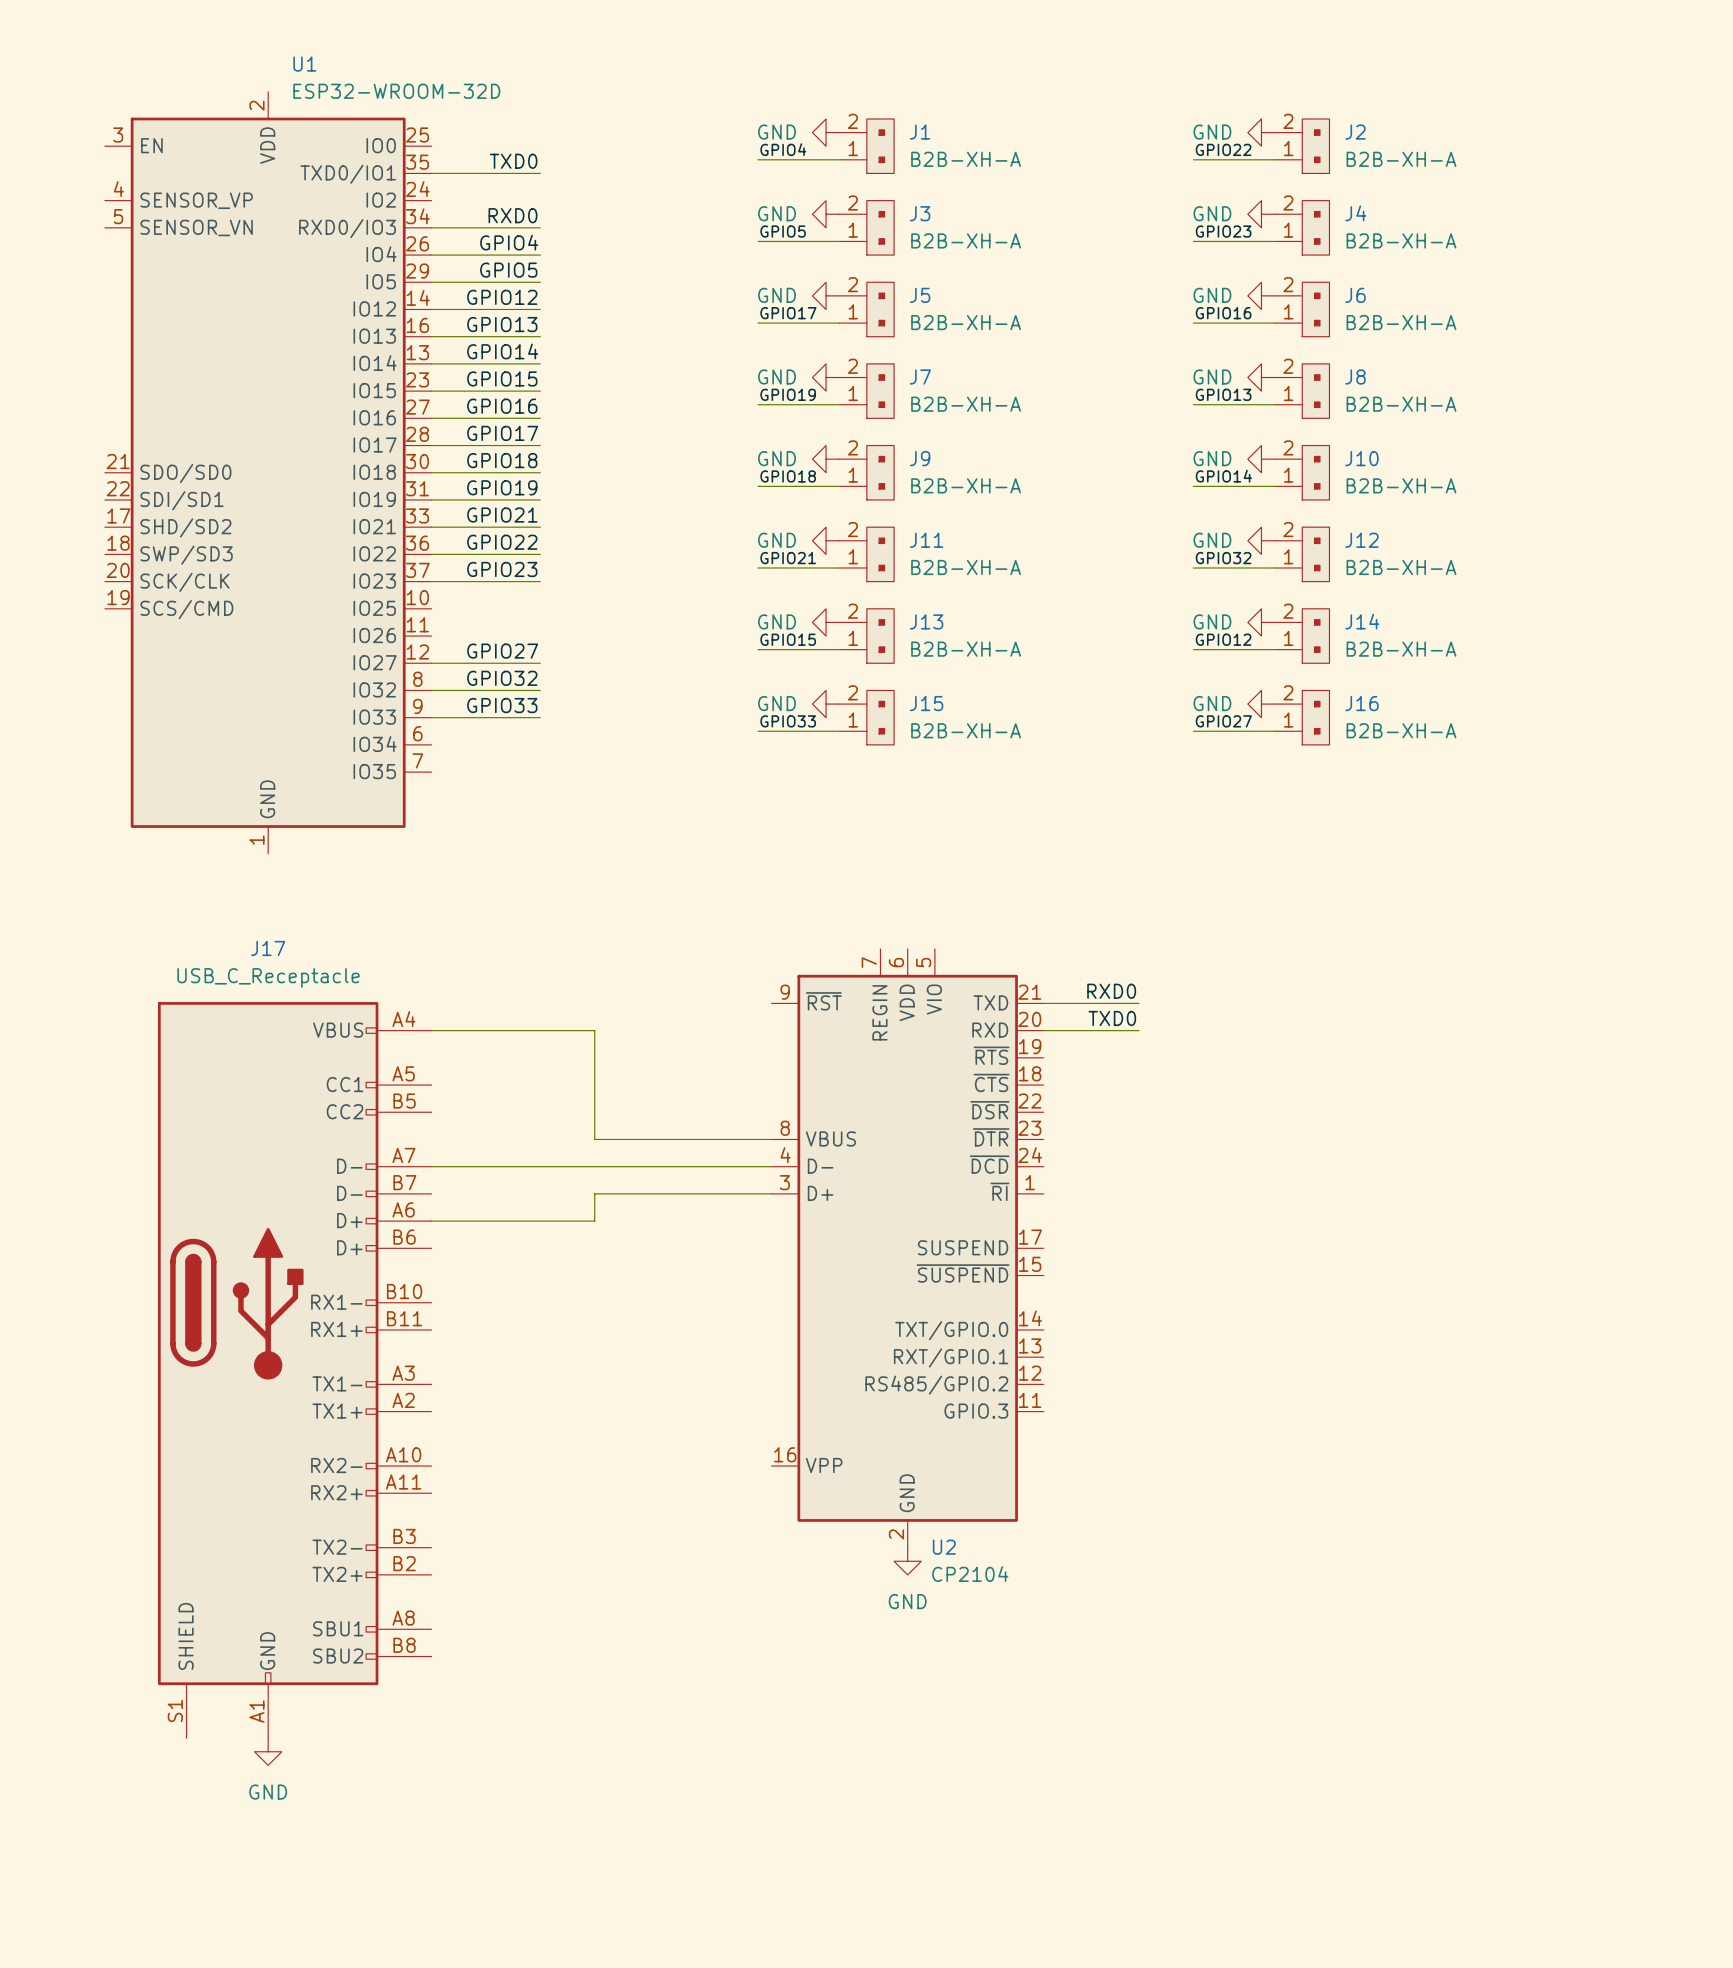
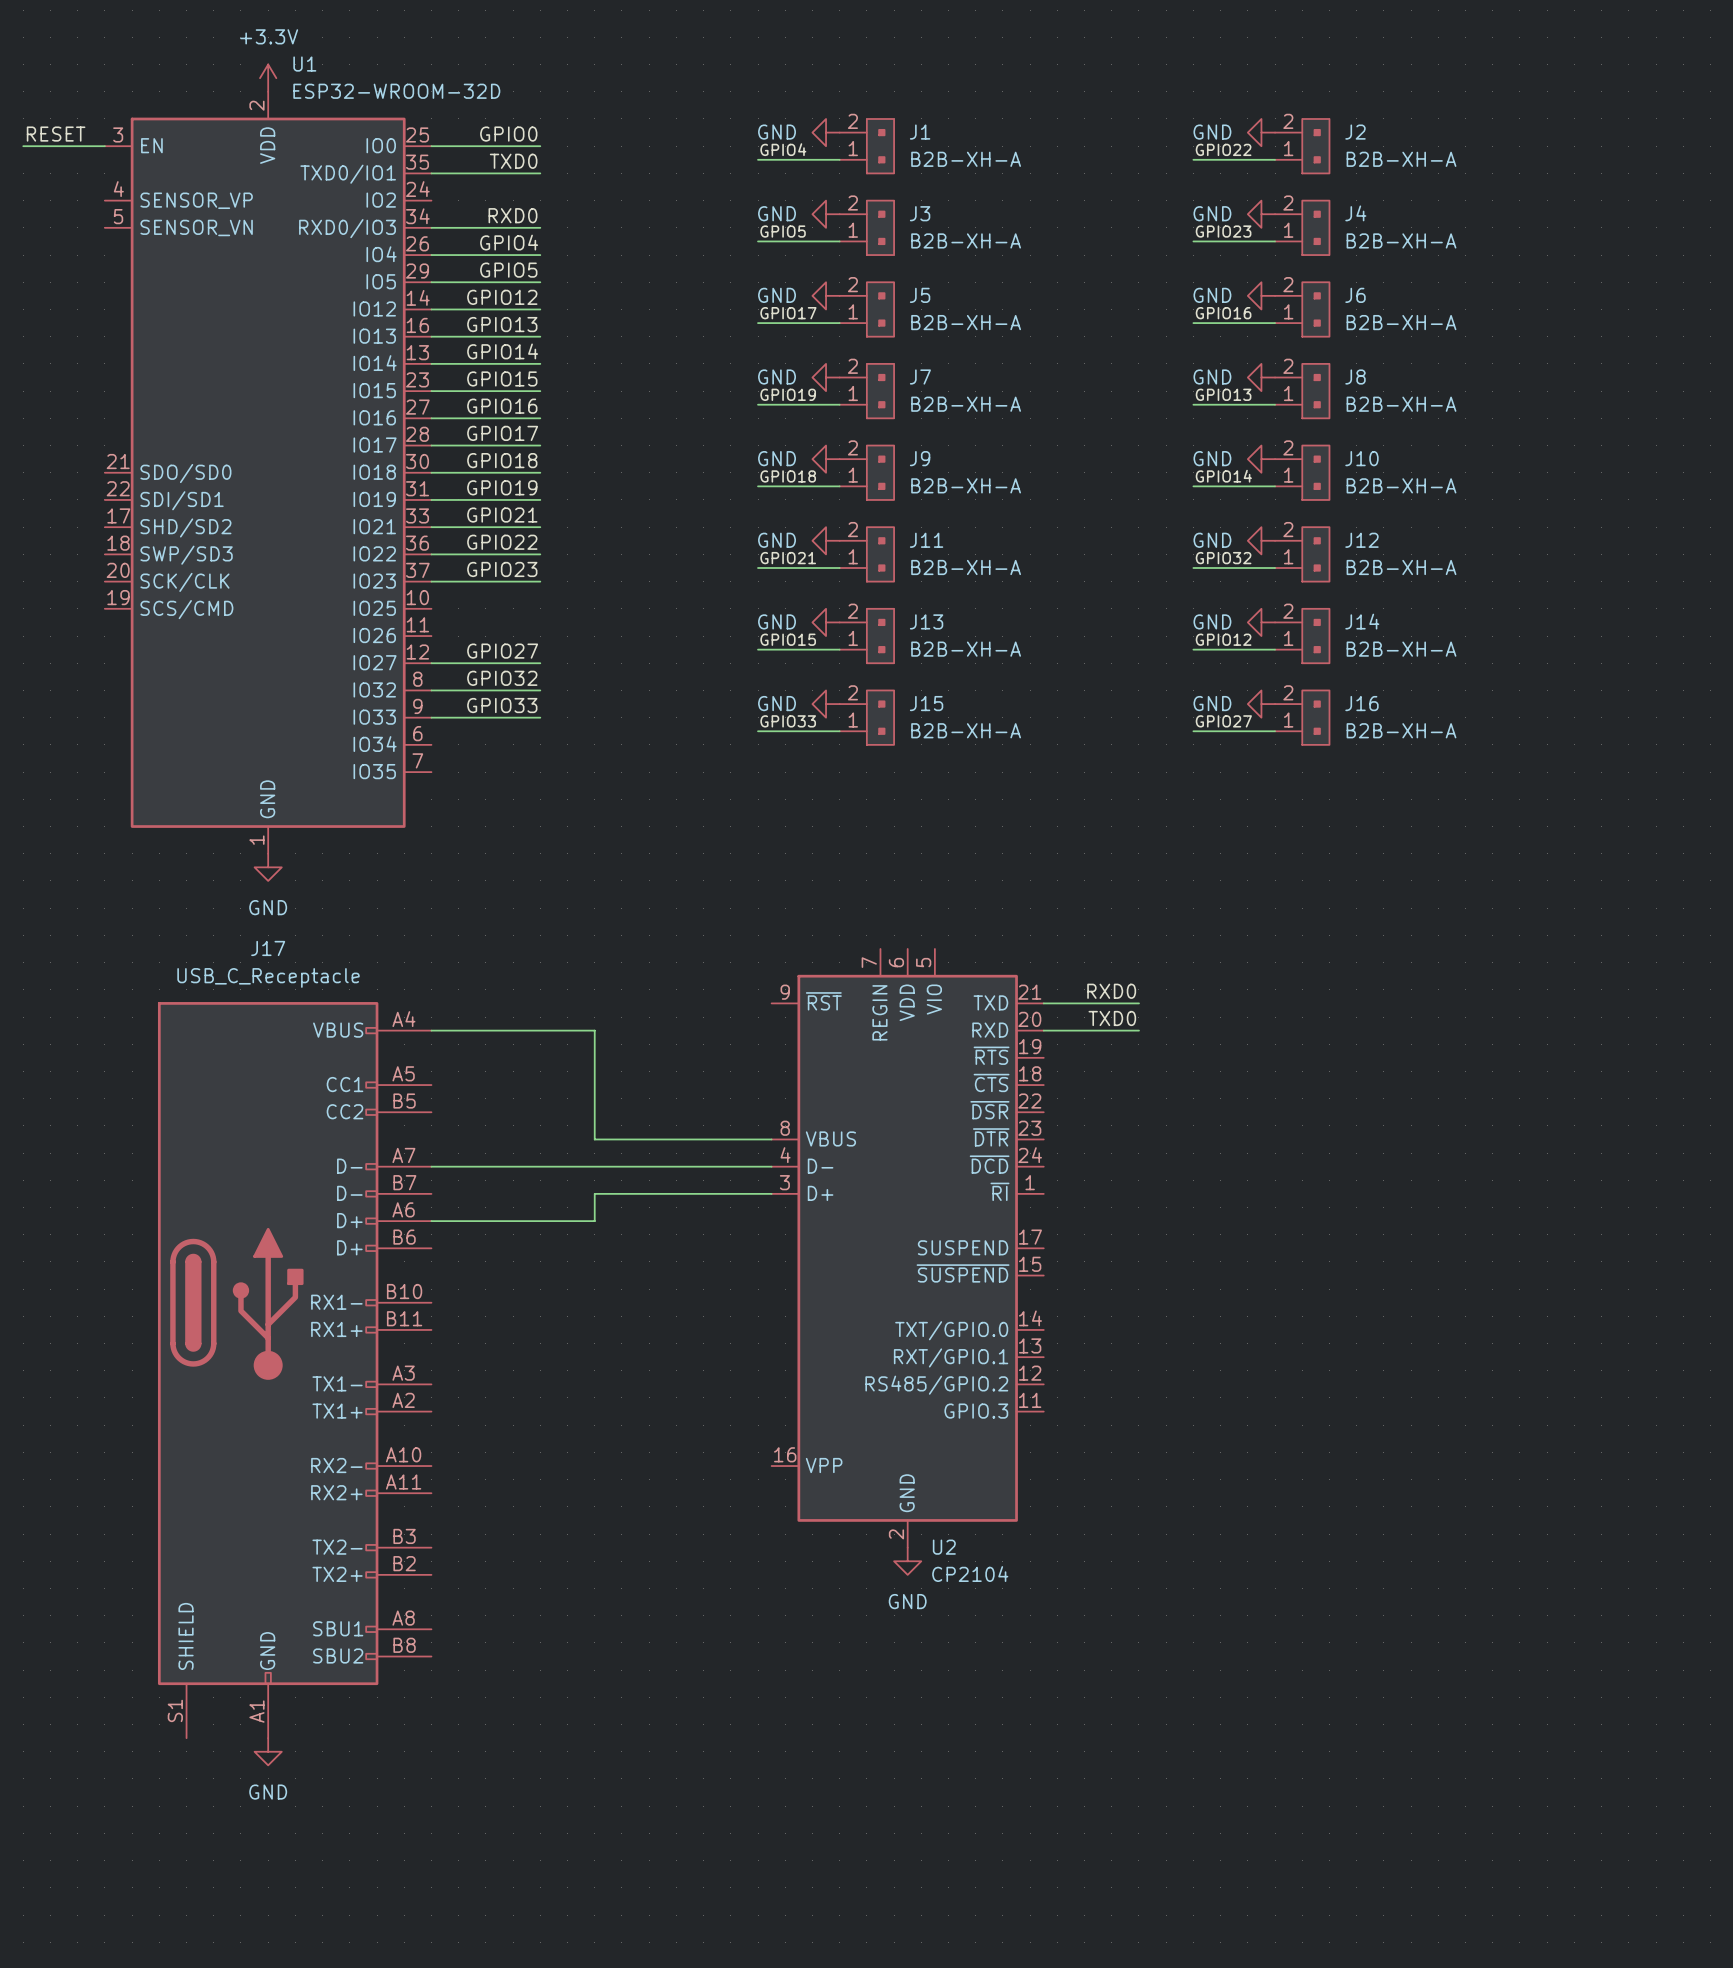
power symbol: none -> +3.3V (268, 78)
label: none -> RESET (56, 134)
label: none -> GPIO0 (508, 134)
wire: none -> (23, 146) (104, 146)
wire: none -> (431, 146) (540, 146)
power symbol: none -> GND (268, 867)

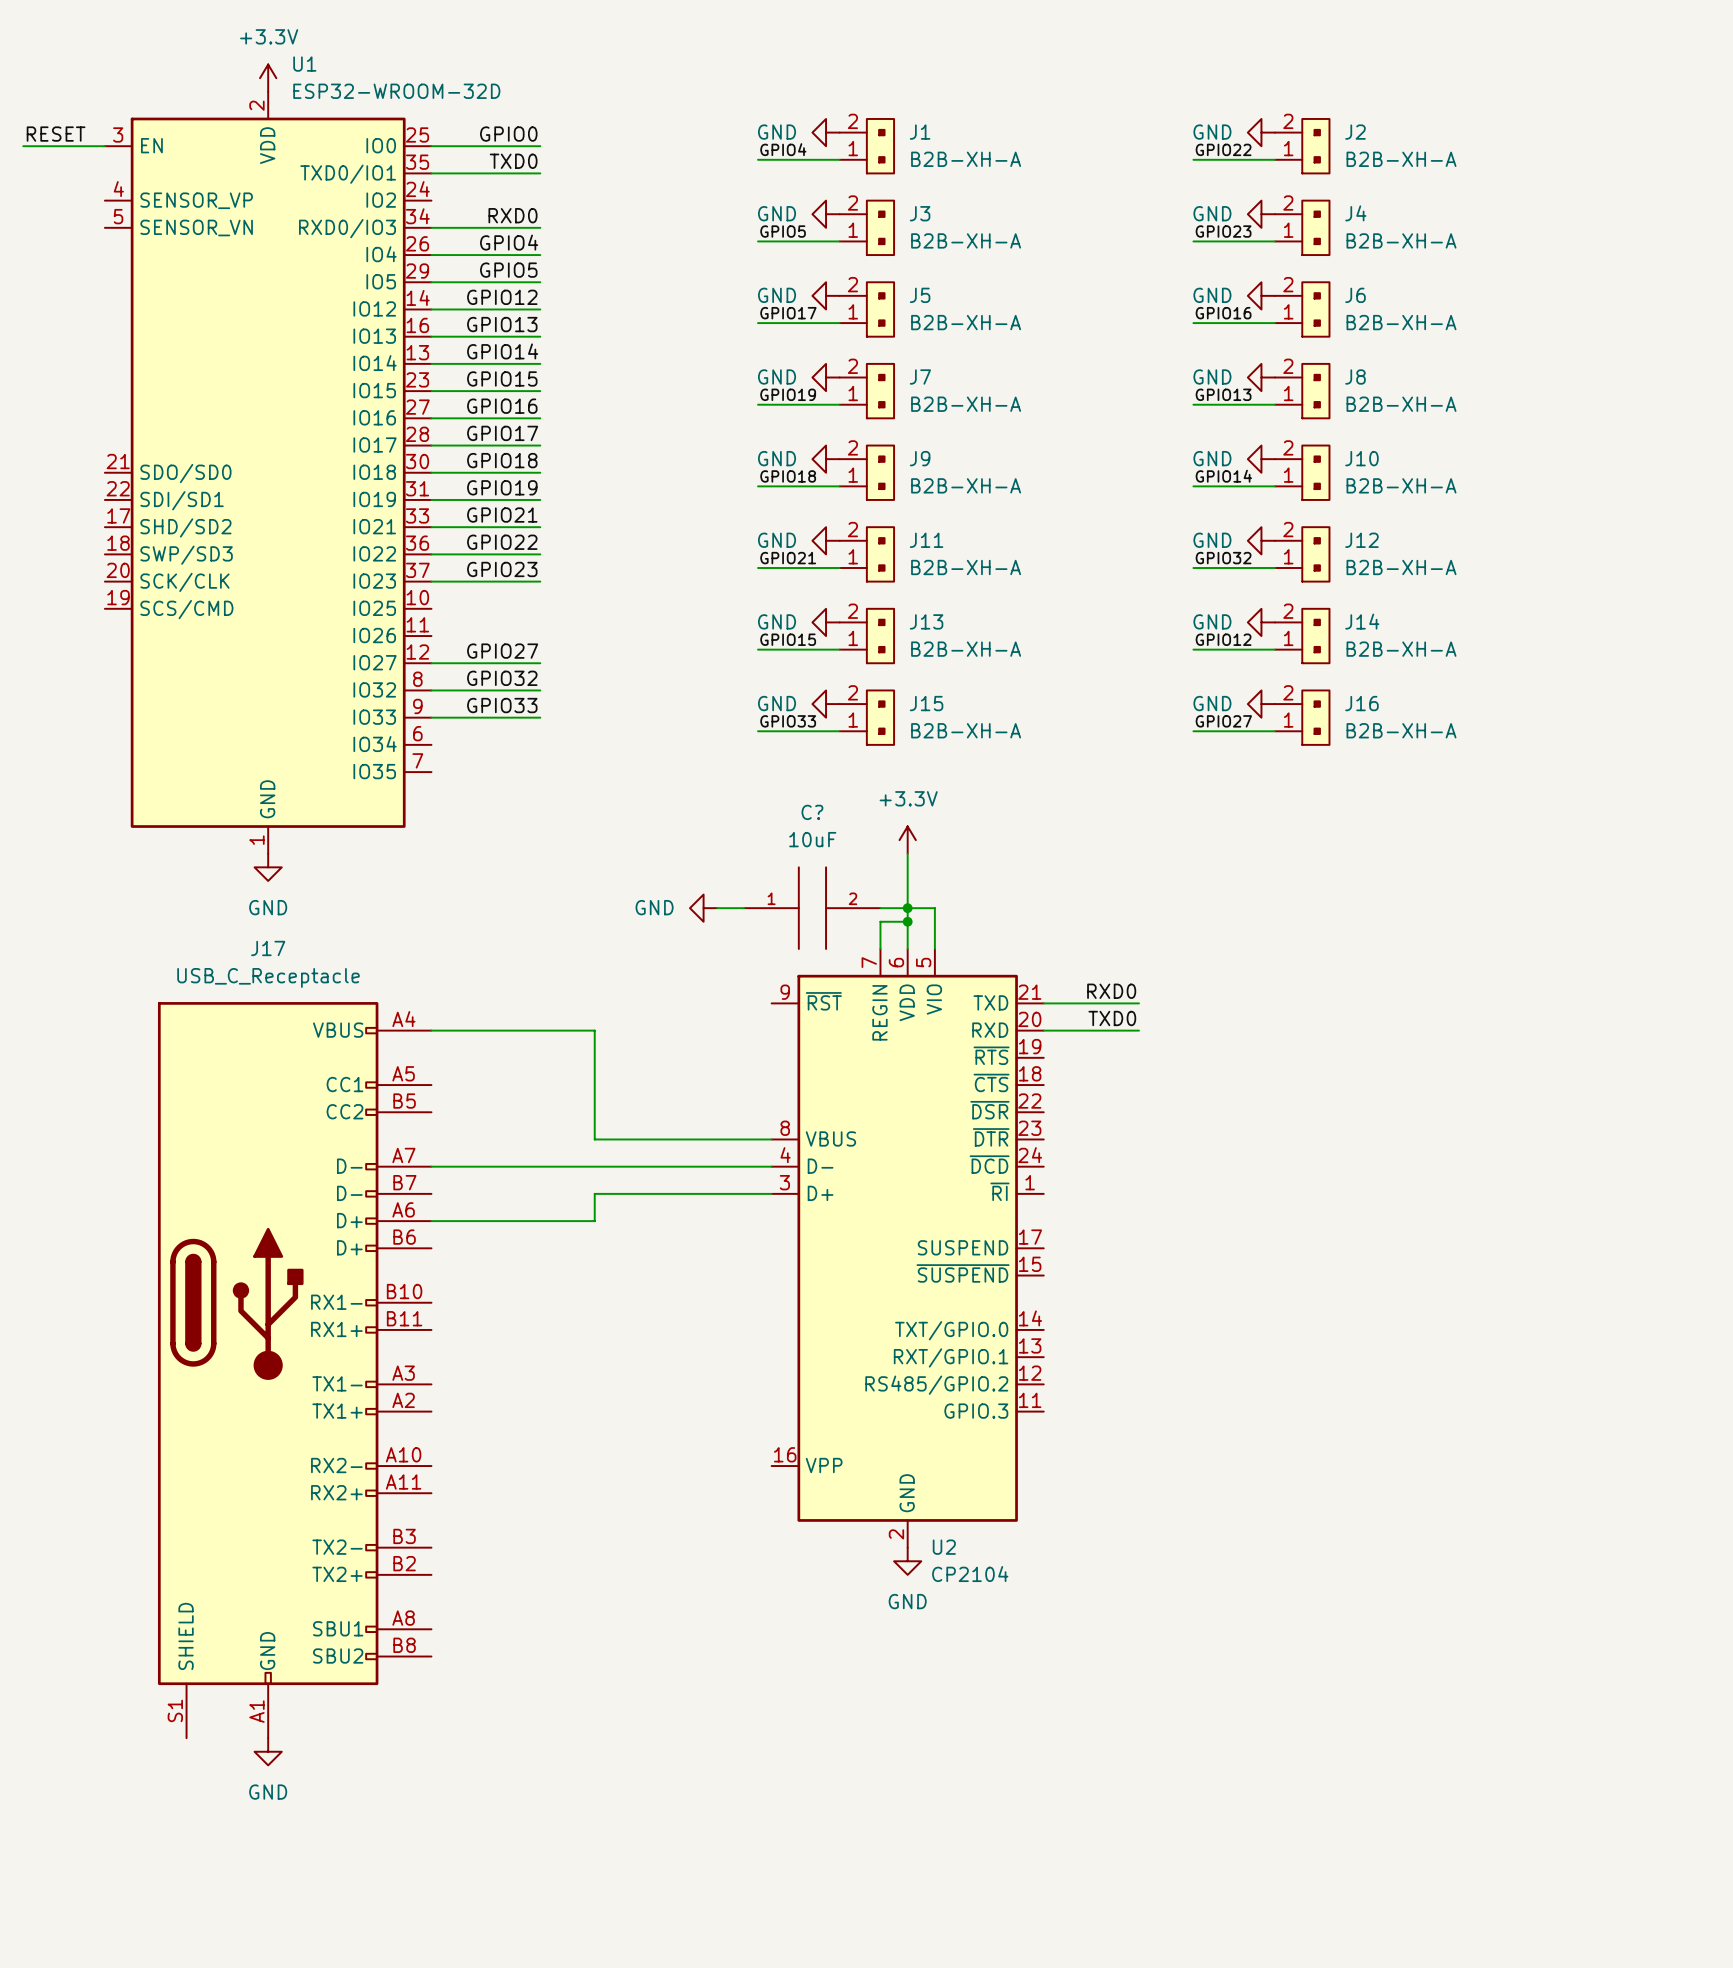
power symbol: none -> +3.3V (907, 840)
wire: none -> (907, 853) (907, 948)
power symbol: none -> GND (703, 908)
wire: none -> (717, 908) (744, 908)
C?: none -> 10uF (812, 908)
wire: none -> (880, 908) (934, 908) (934, 948)
junction: none -> (907, 908)
wire: none -> (907, 921) (880, 921) (880, 948)
junction: none -> (907, 921)

